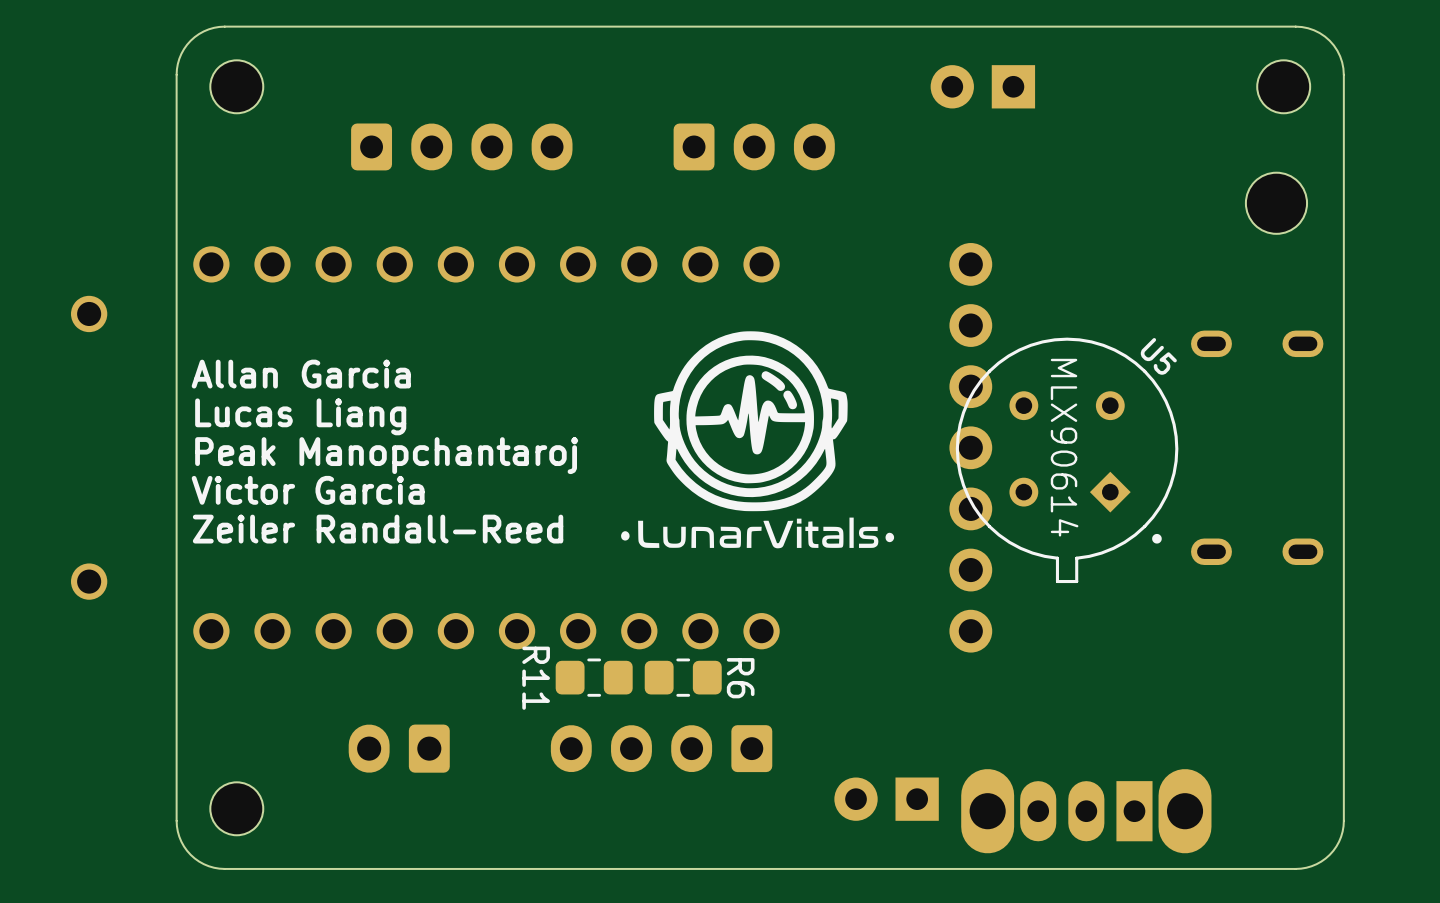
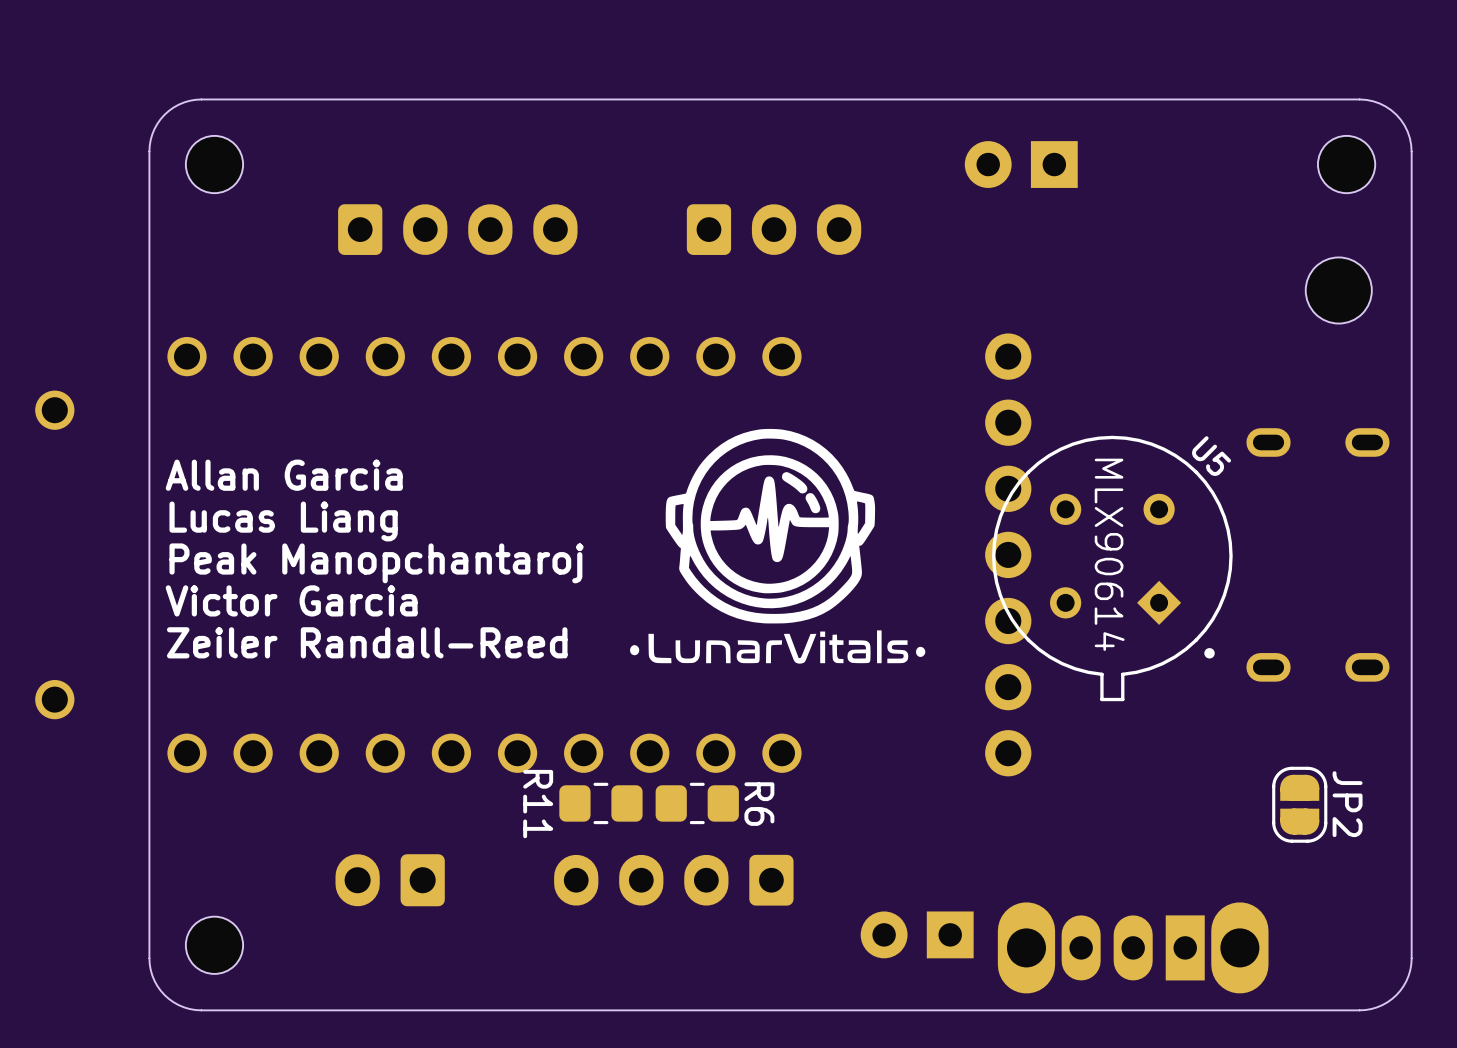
JP2: none -> (1299, 804)

